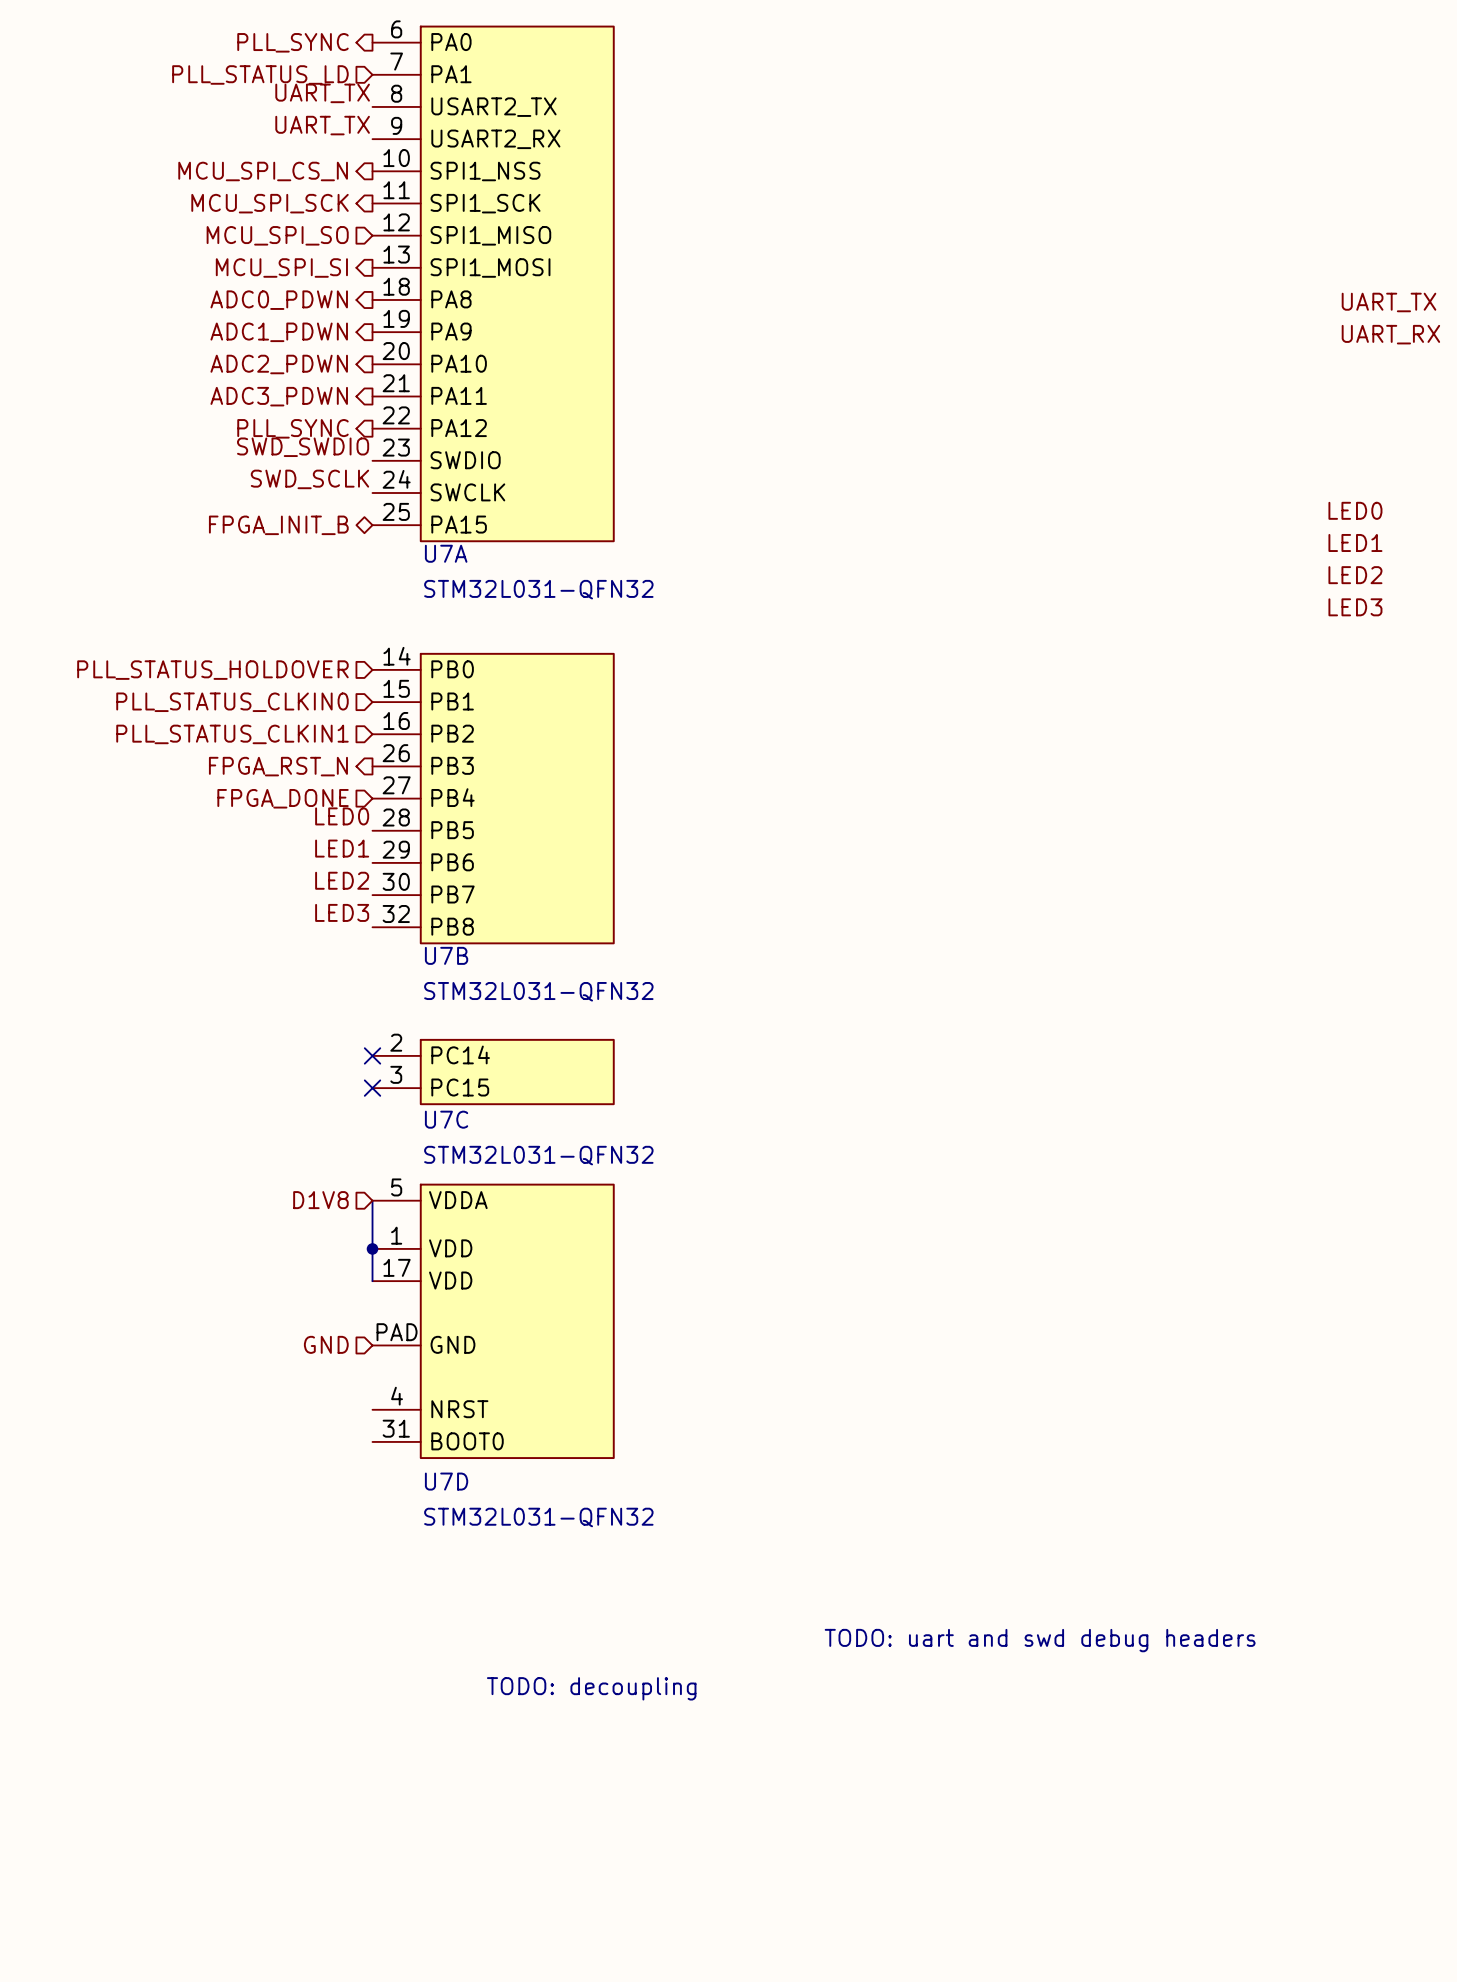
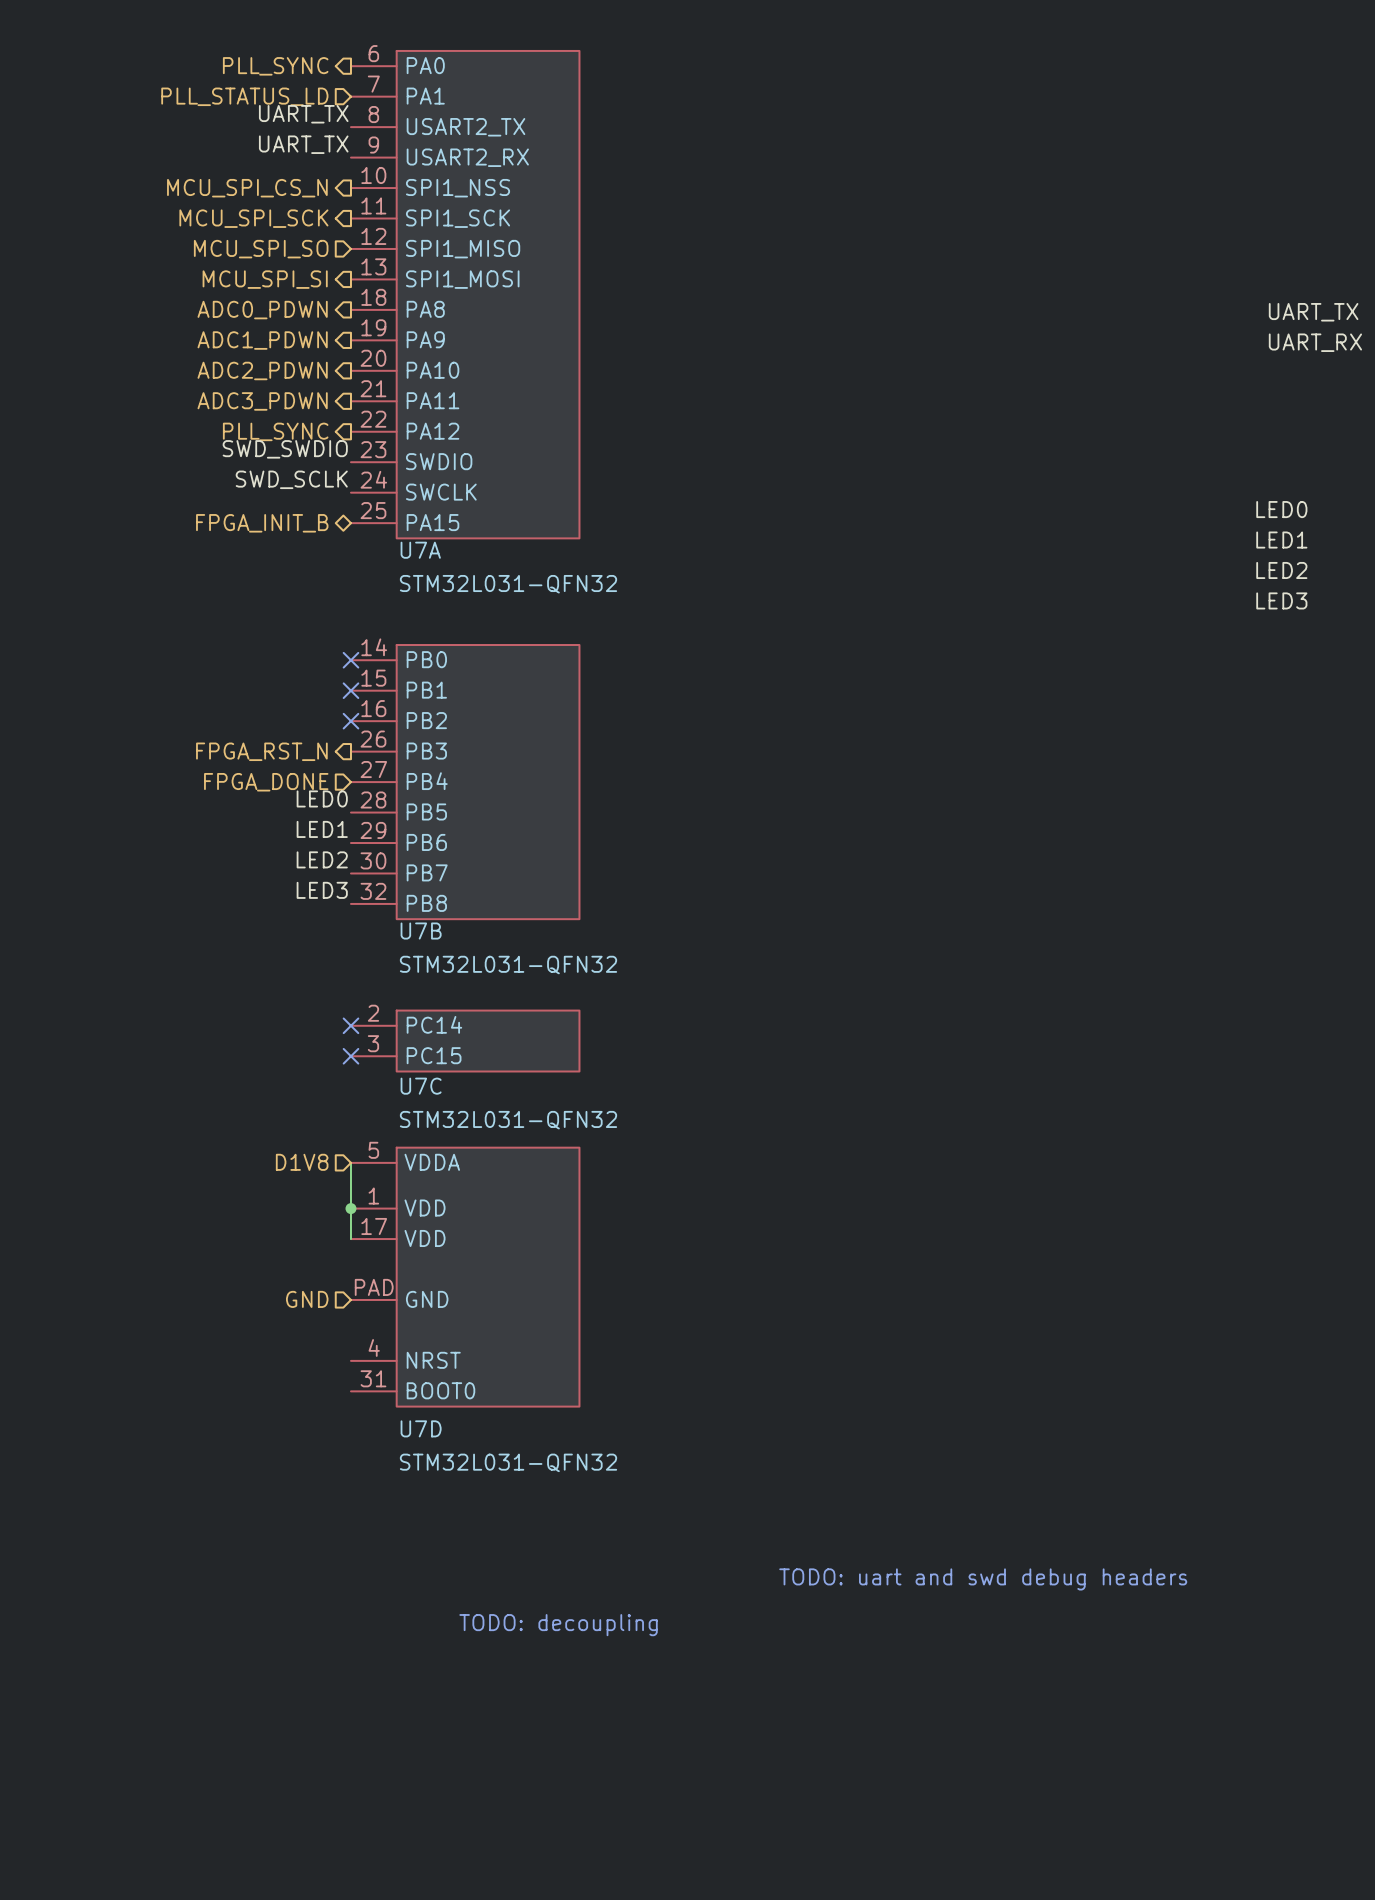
no-connect mark: none -> (350, 660)
hierarchical label: PLL_STATUS_HOLDOVER (212, 670) -> none
hierarchical label: PLL_STATUS_CLKIN0 (232, 702) -> none
no-connect mark: none -> (350, 690)
hierarchical label: PLL_STATUS_CLKIN1 (232, 734) -> none
no-connect mark: none -> (350, 721)

